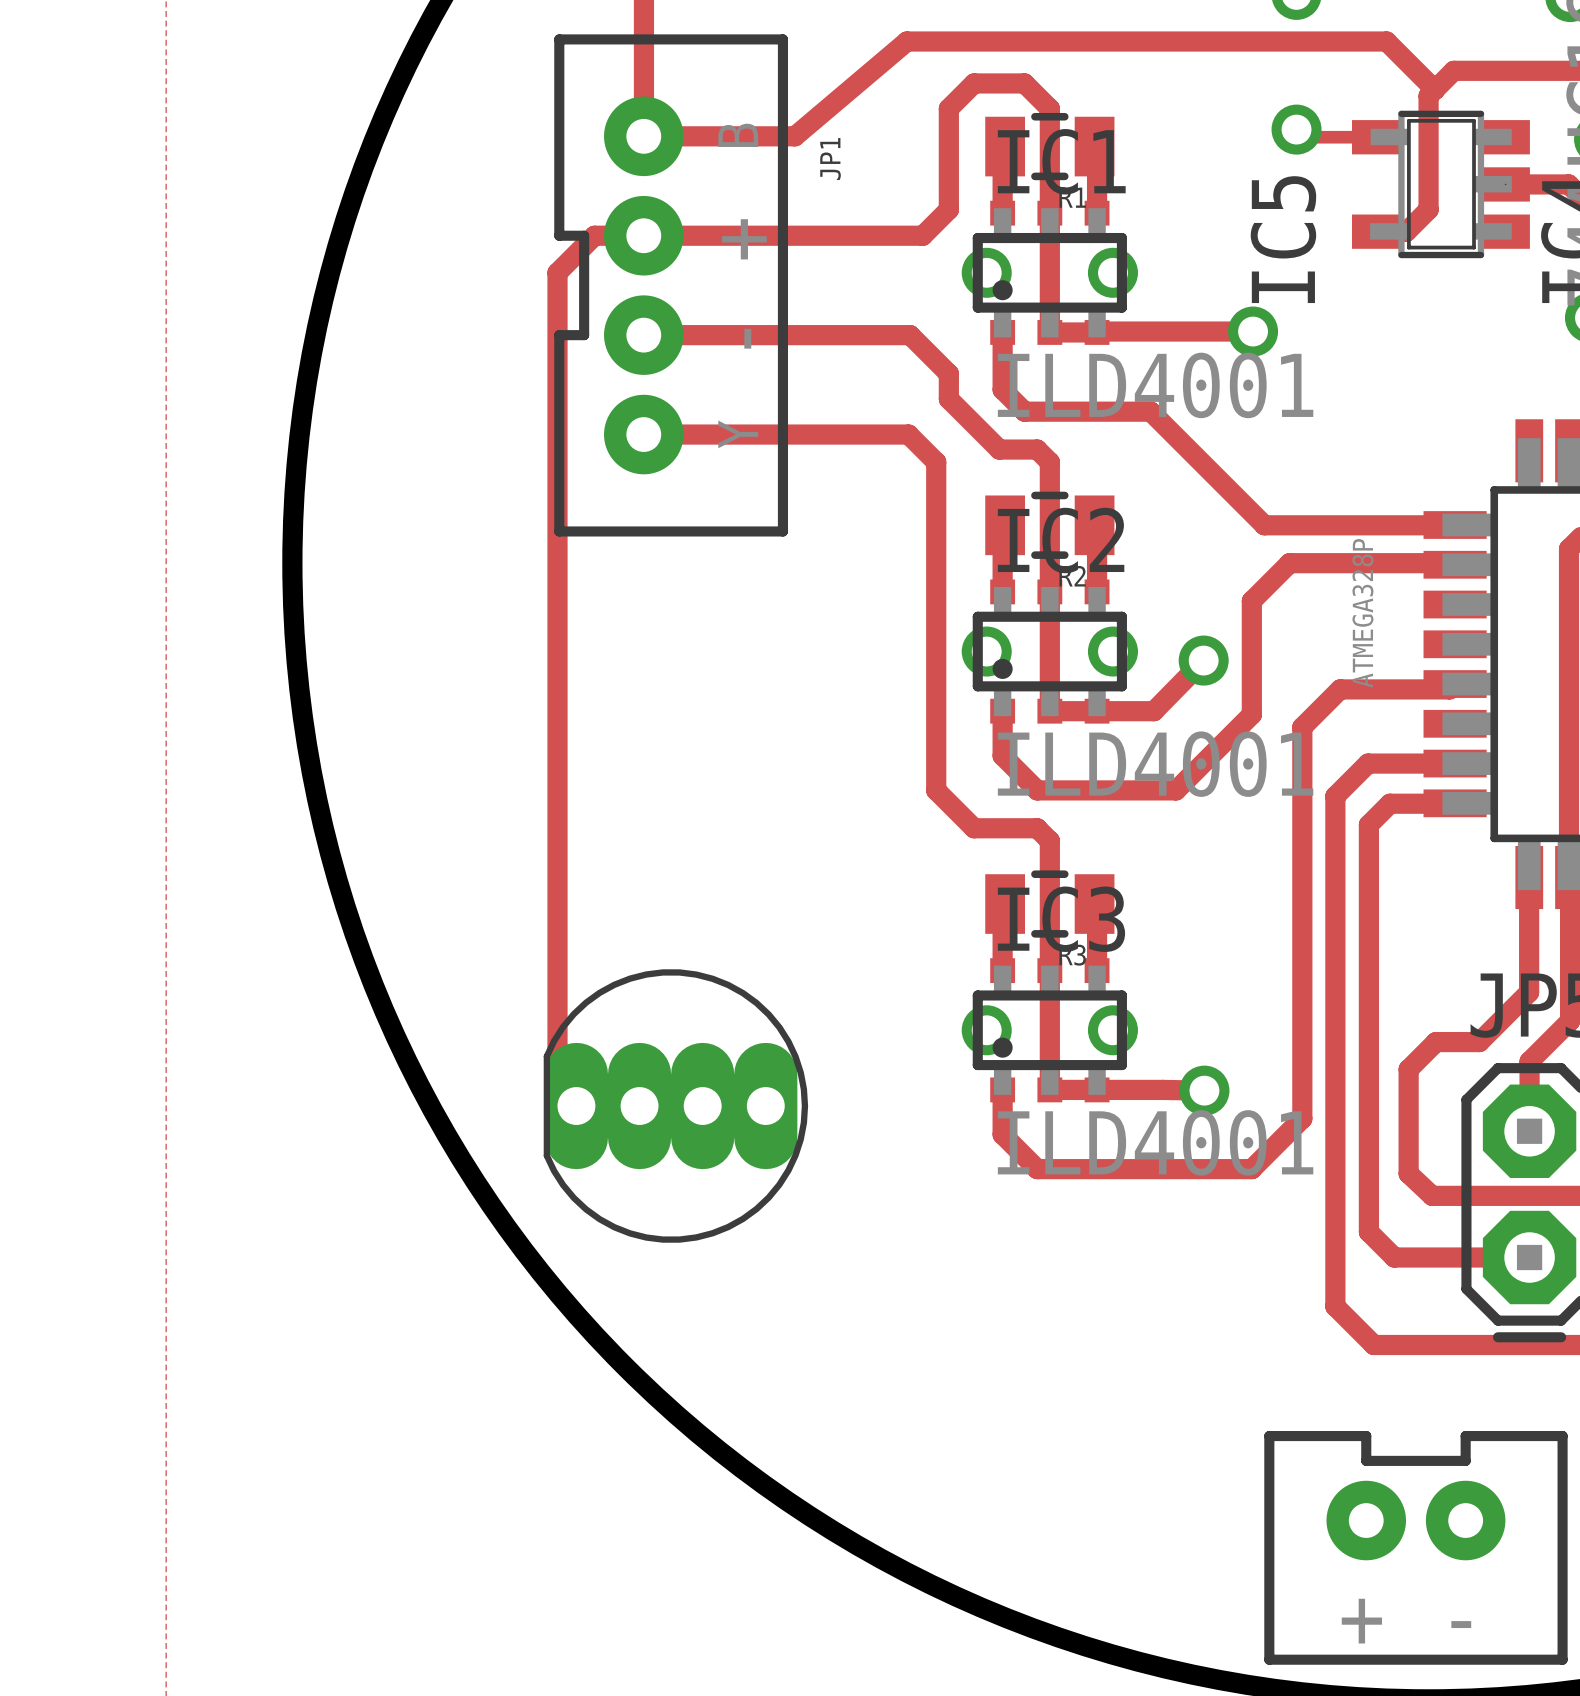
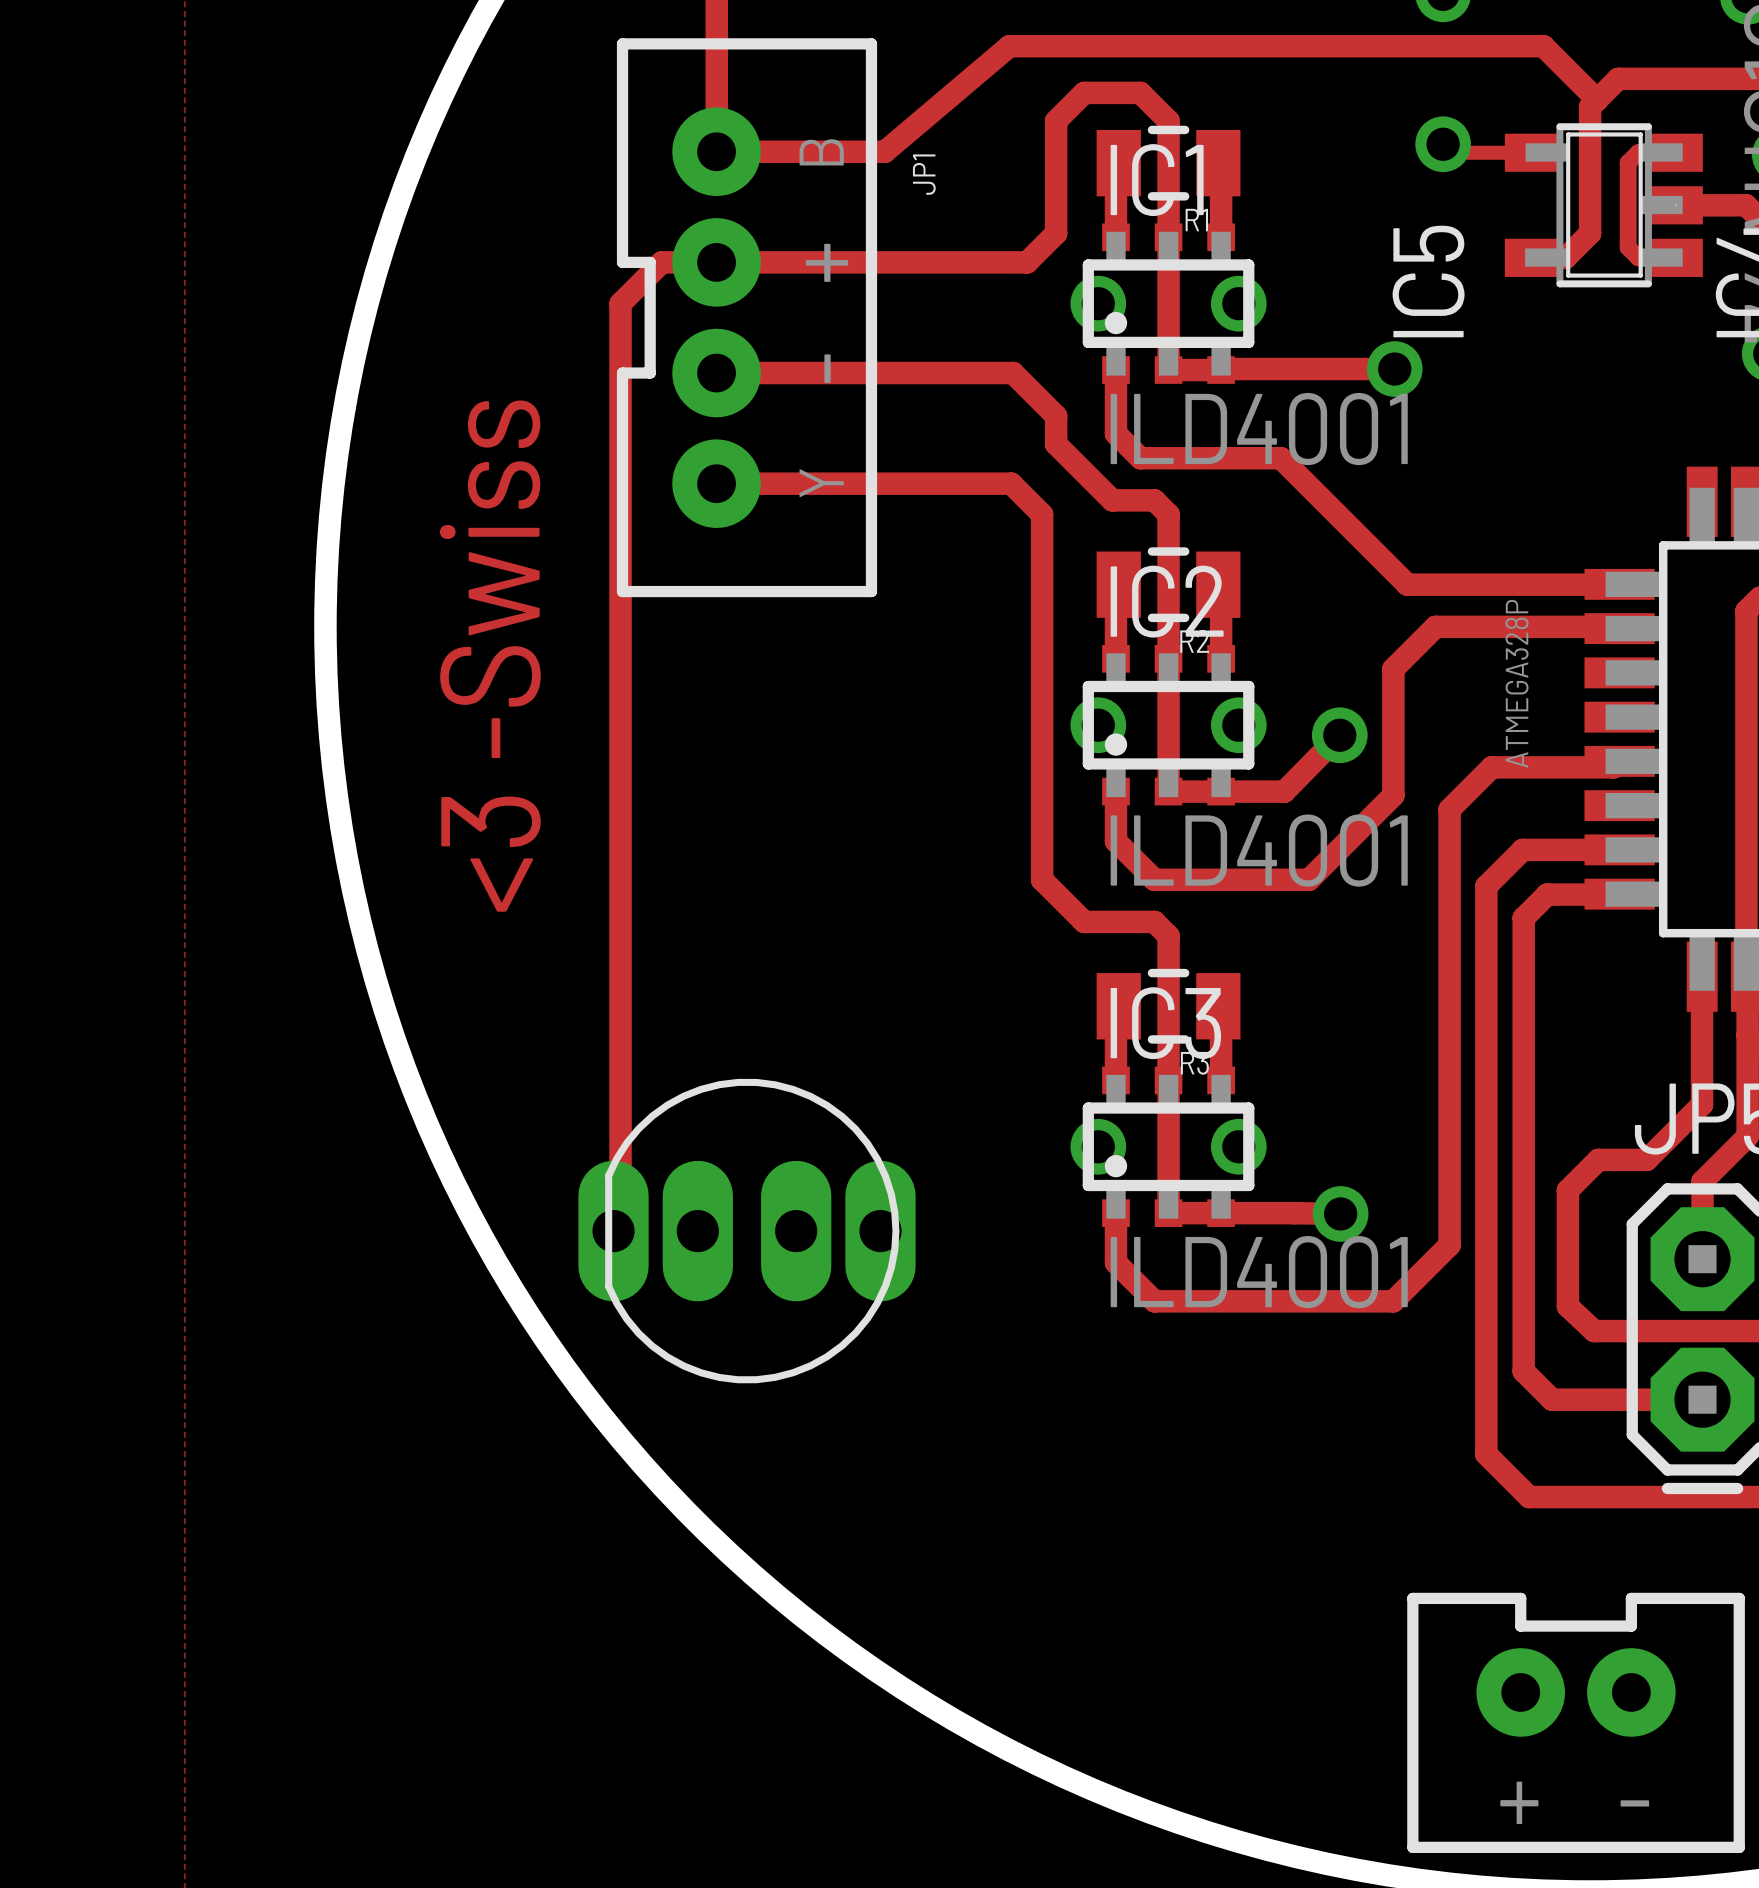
track: none -> (1675, 152) (1638, 152) (1628, 162) (1628, 247) (1638, 257) (1675, 257)
text: none -> <3 -Swiss (490, 656)
part footprint: [543, 969, 809, 1243] -> [578, 1078, 916, 1384]

